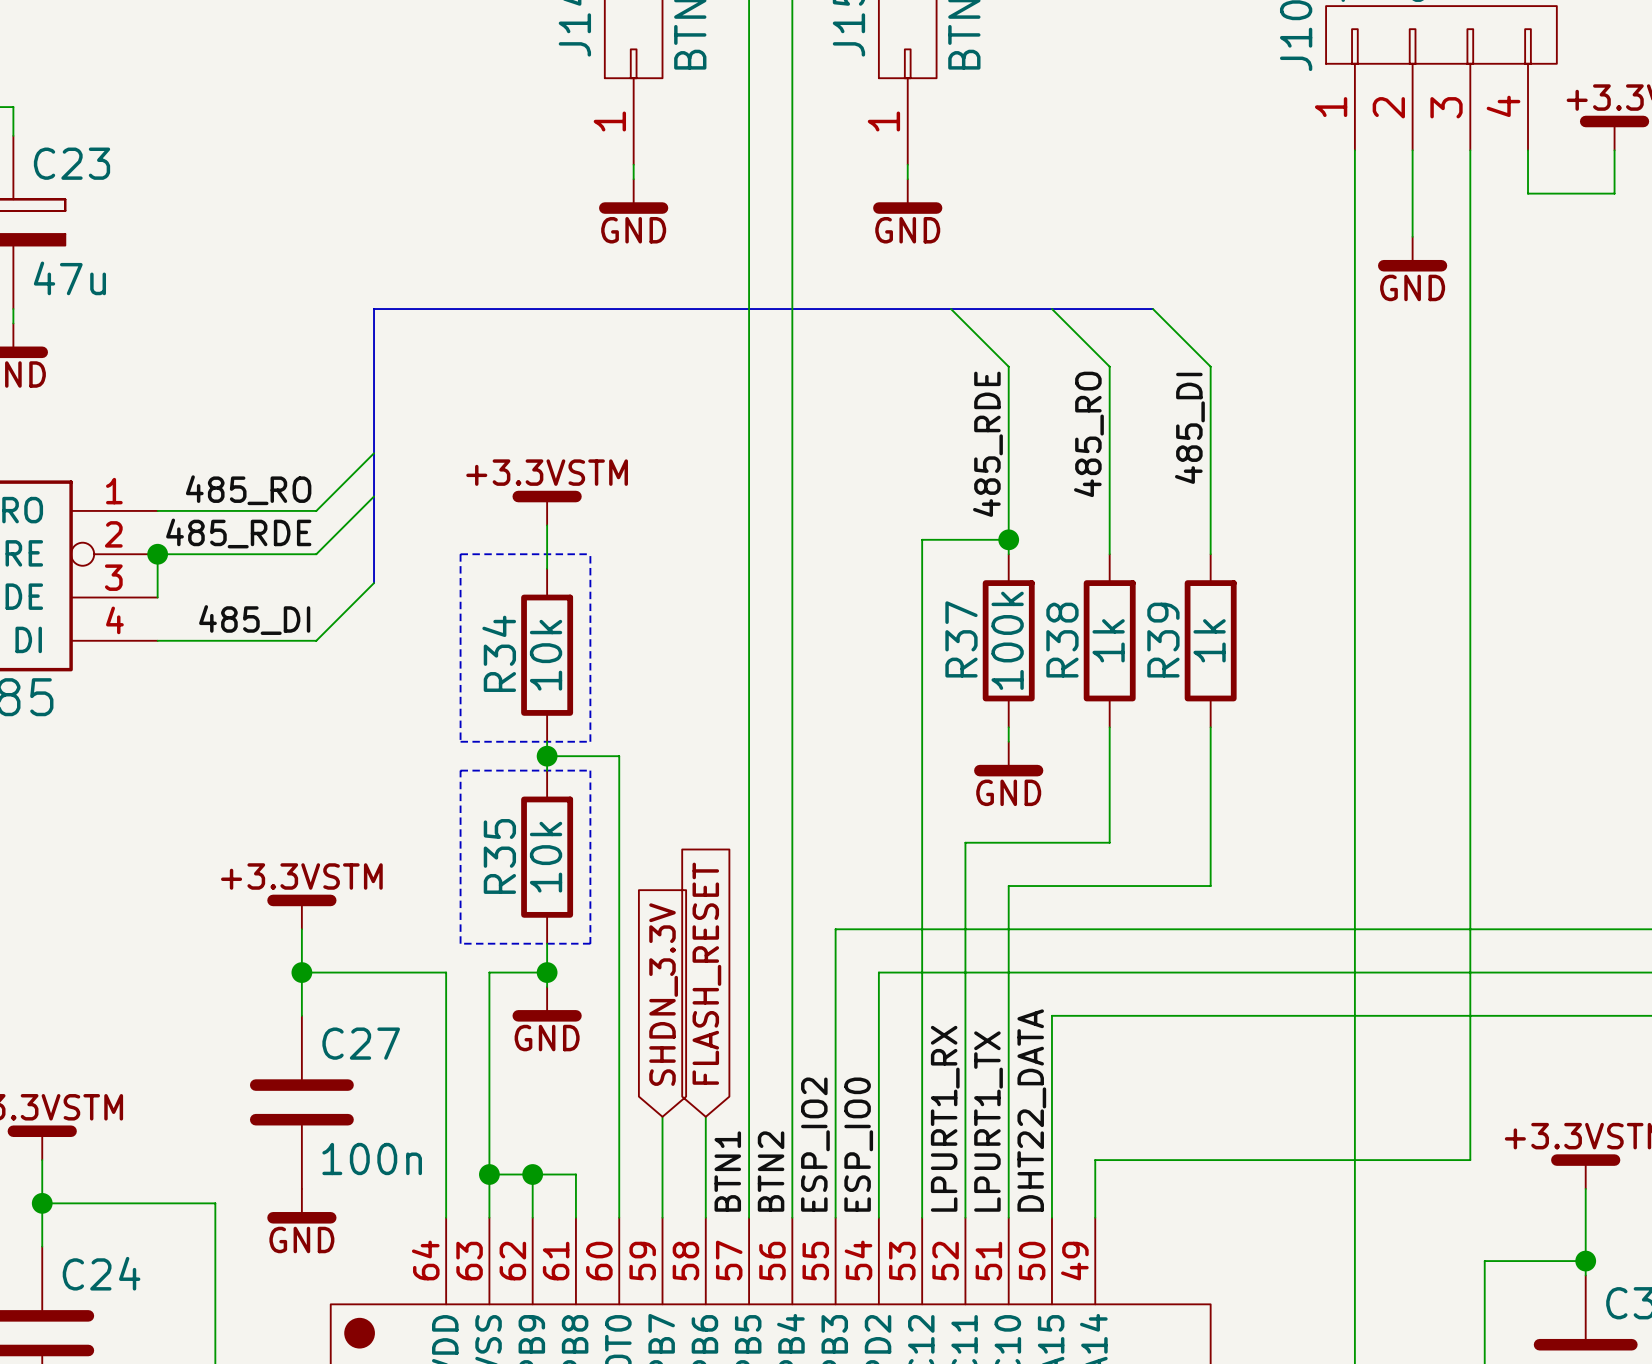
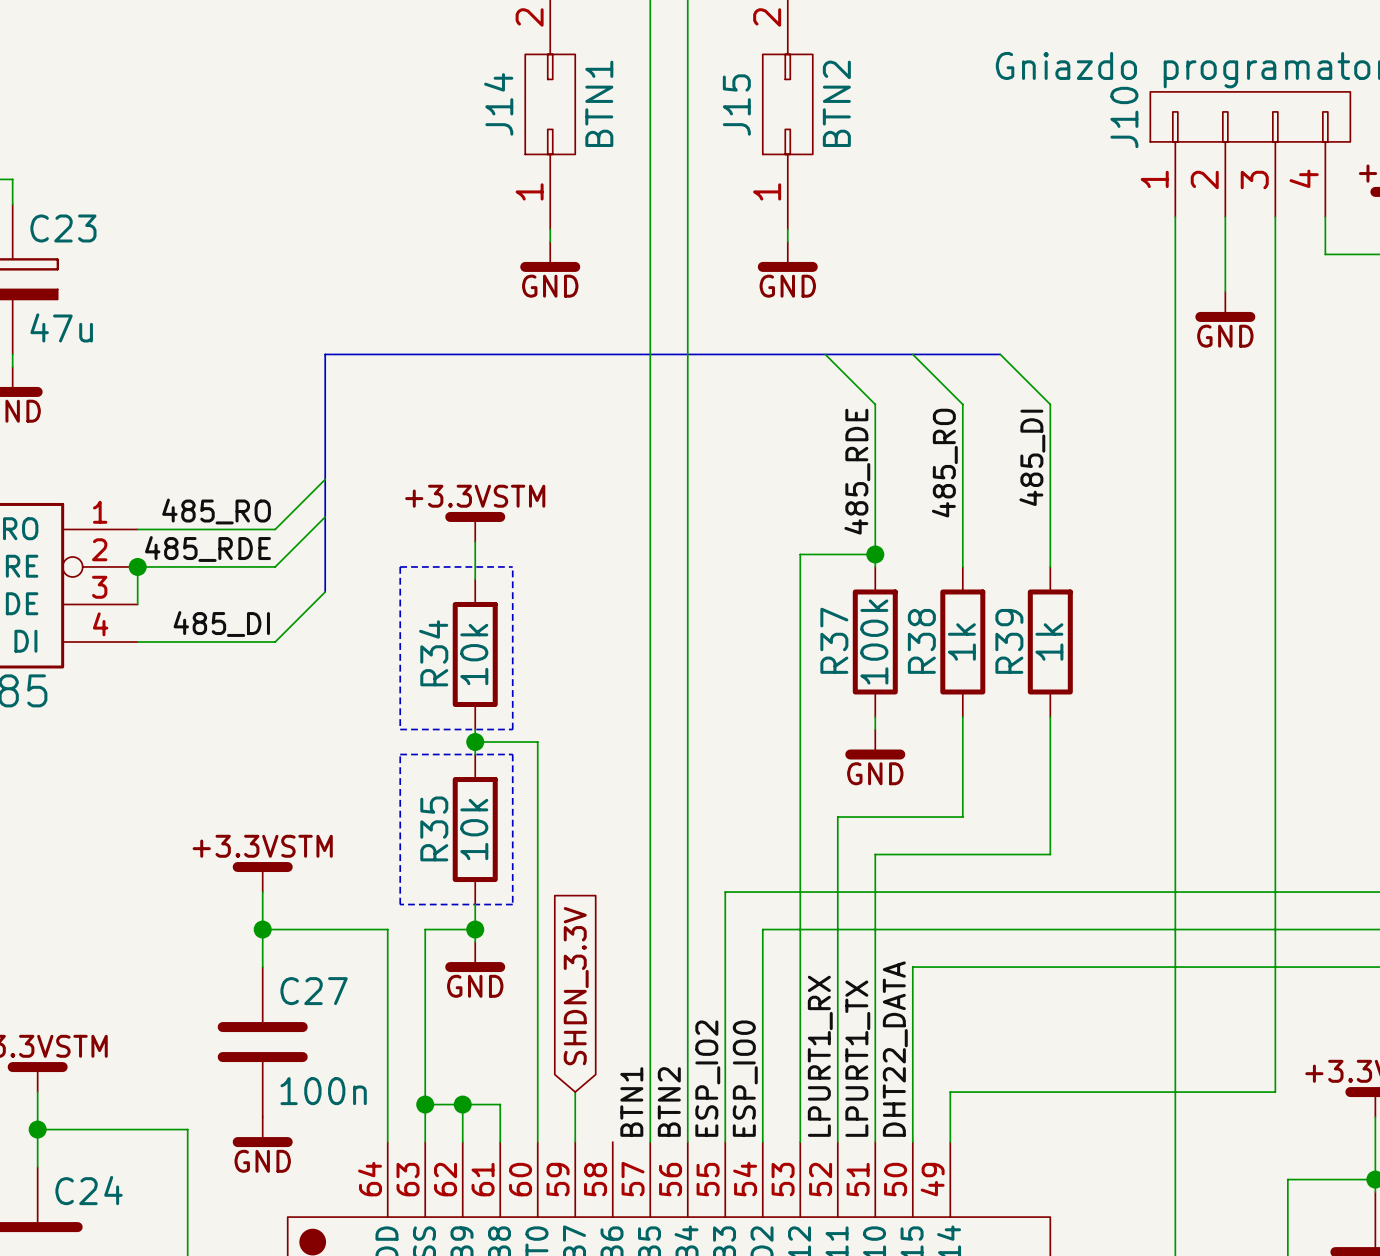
global label: FLASH_RESET (706, 973) -> none
global label position: SHDN_3.3V (663, 994) -> SHDN_3.3V (576, 986)
wire: (662, 1116) (662, 1160) -> none
wire: (705, 1116) (705, 1217) -> none

